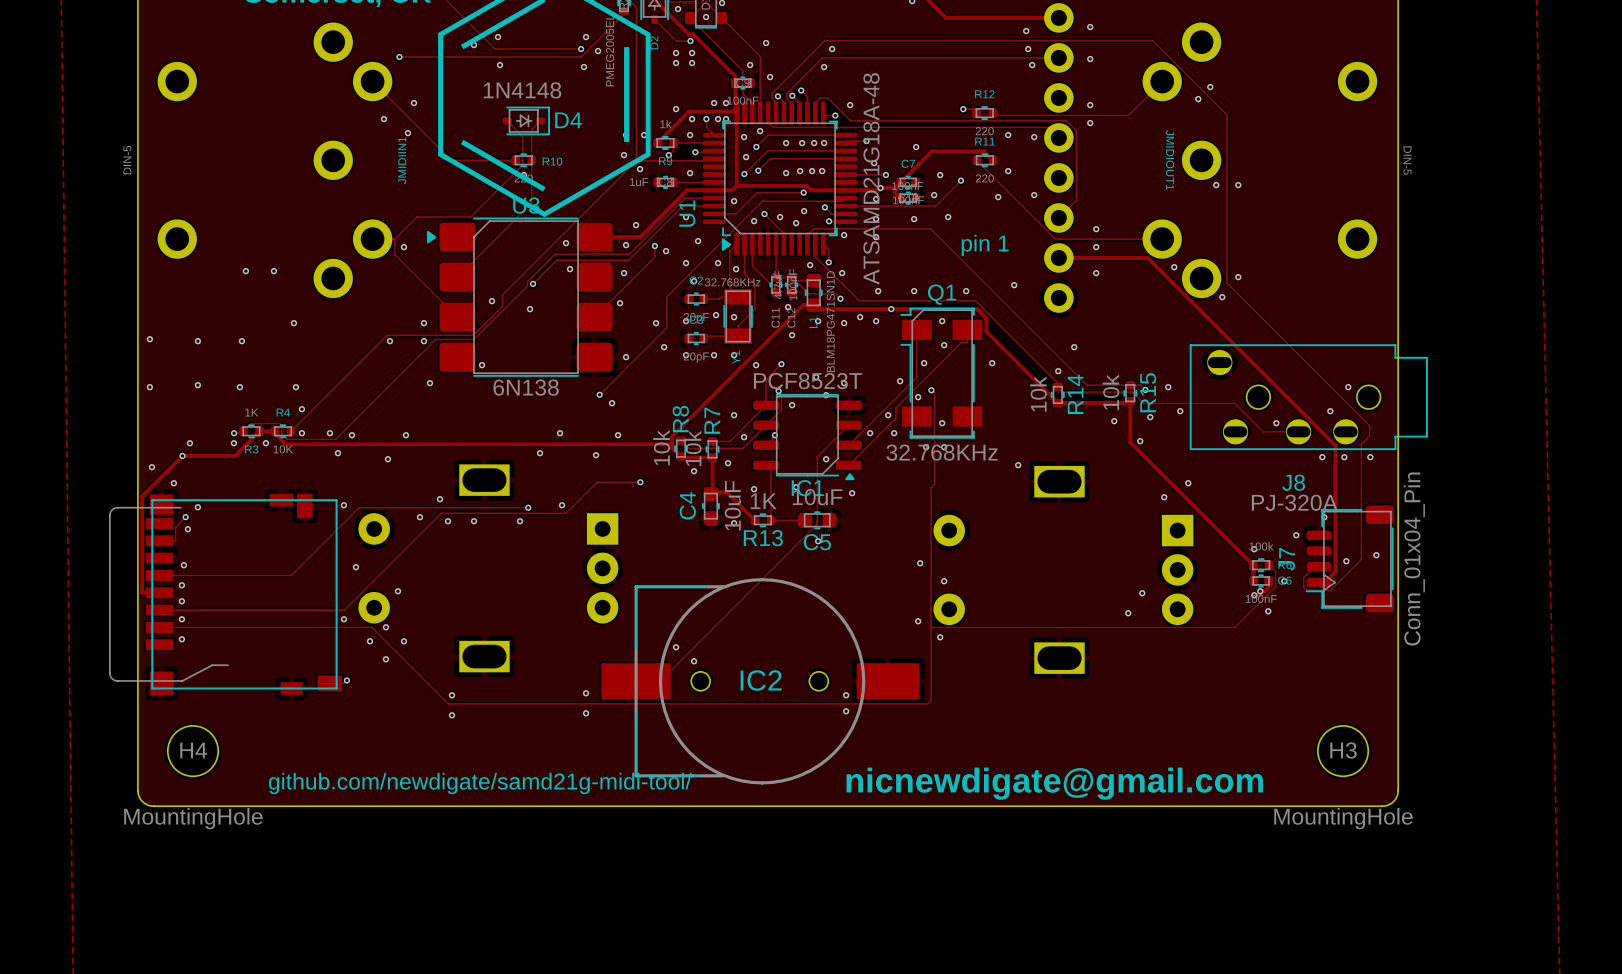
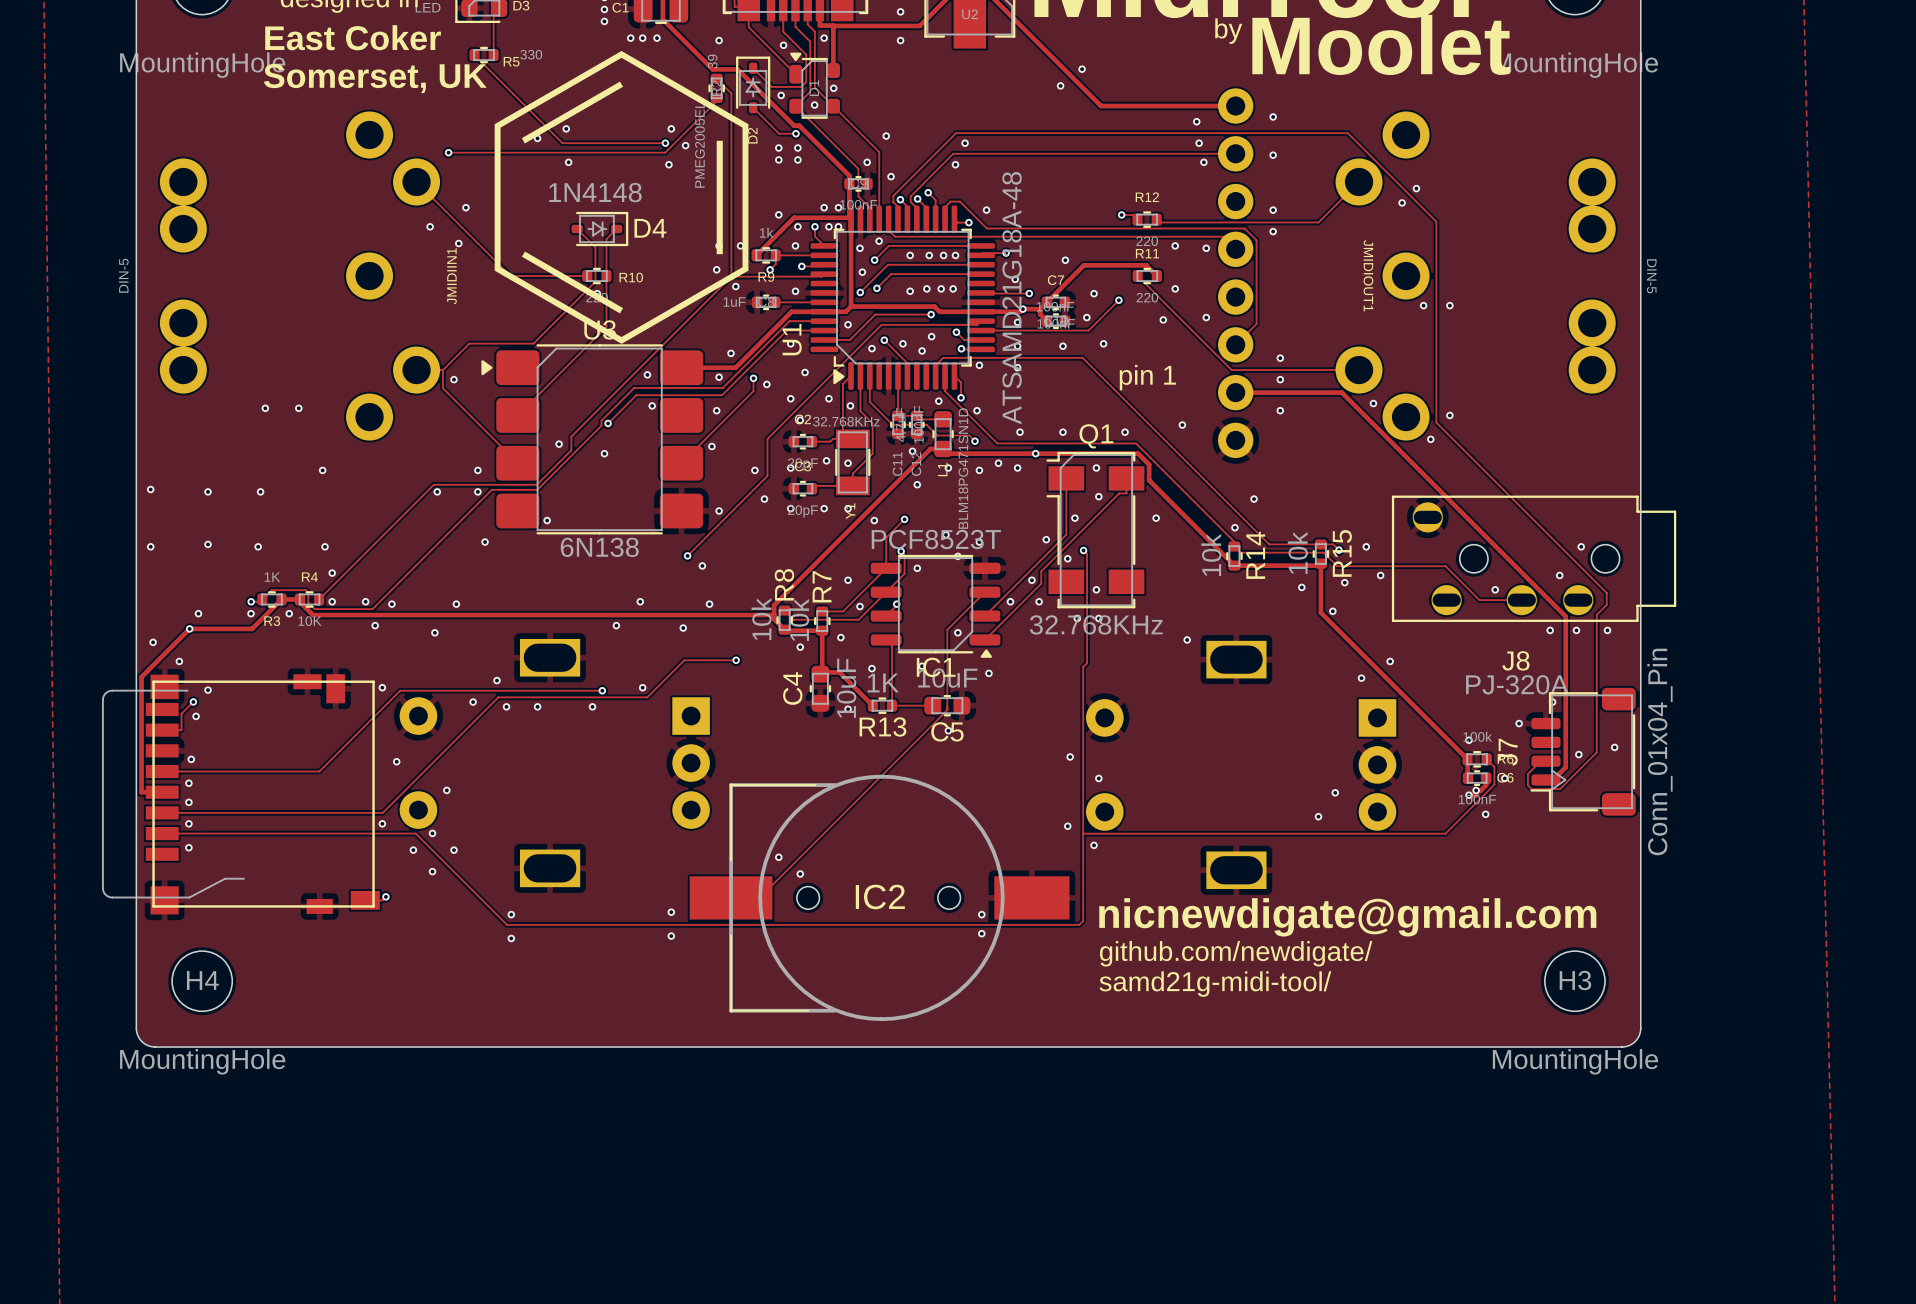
JMIDIIN1 footprint: [157, 22, 393, 299] -> [159, 111, 441, 441]
JMIDIOUT1 footprint: [1142, 22, 1378, 299] -> [1335, 111, 1616, 441]
text: none -> github.com/newdigate/ (1236, 953)
text: none -> samd21g-midi-tool/ (1215, 984)
text: github.com/newdigate/samd21g-midi-tool/ (480, 783) -> none
text position: nicnewdigate@gmail.com (1054, 783) -> nicnewdigate@gmail.com (1347, 917)

